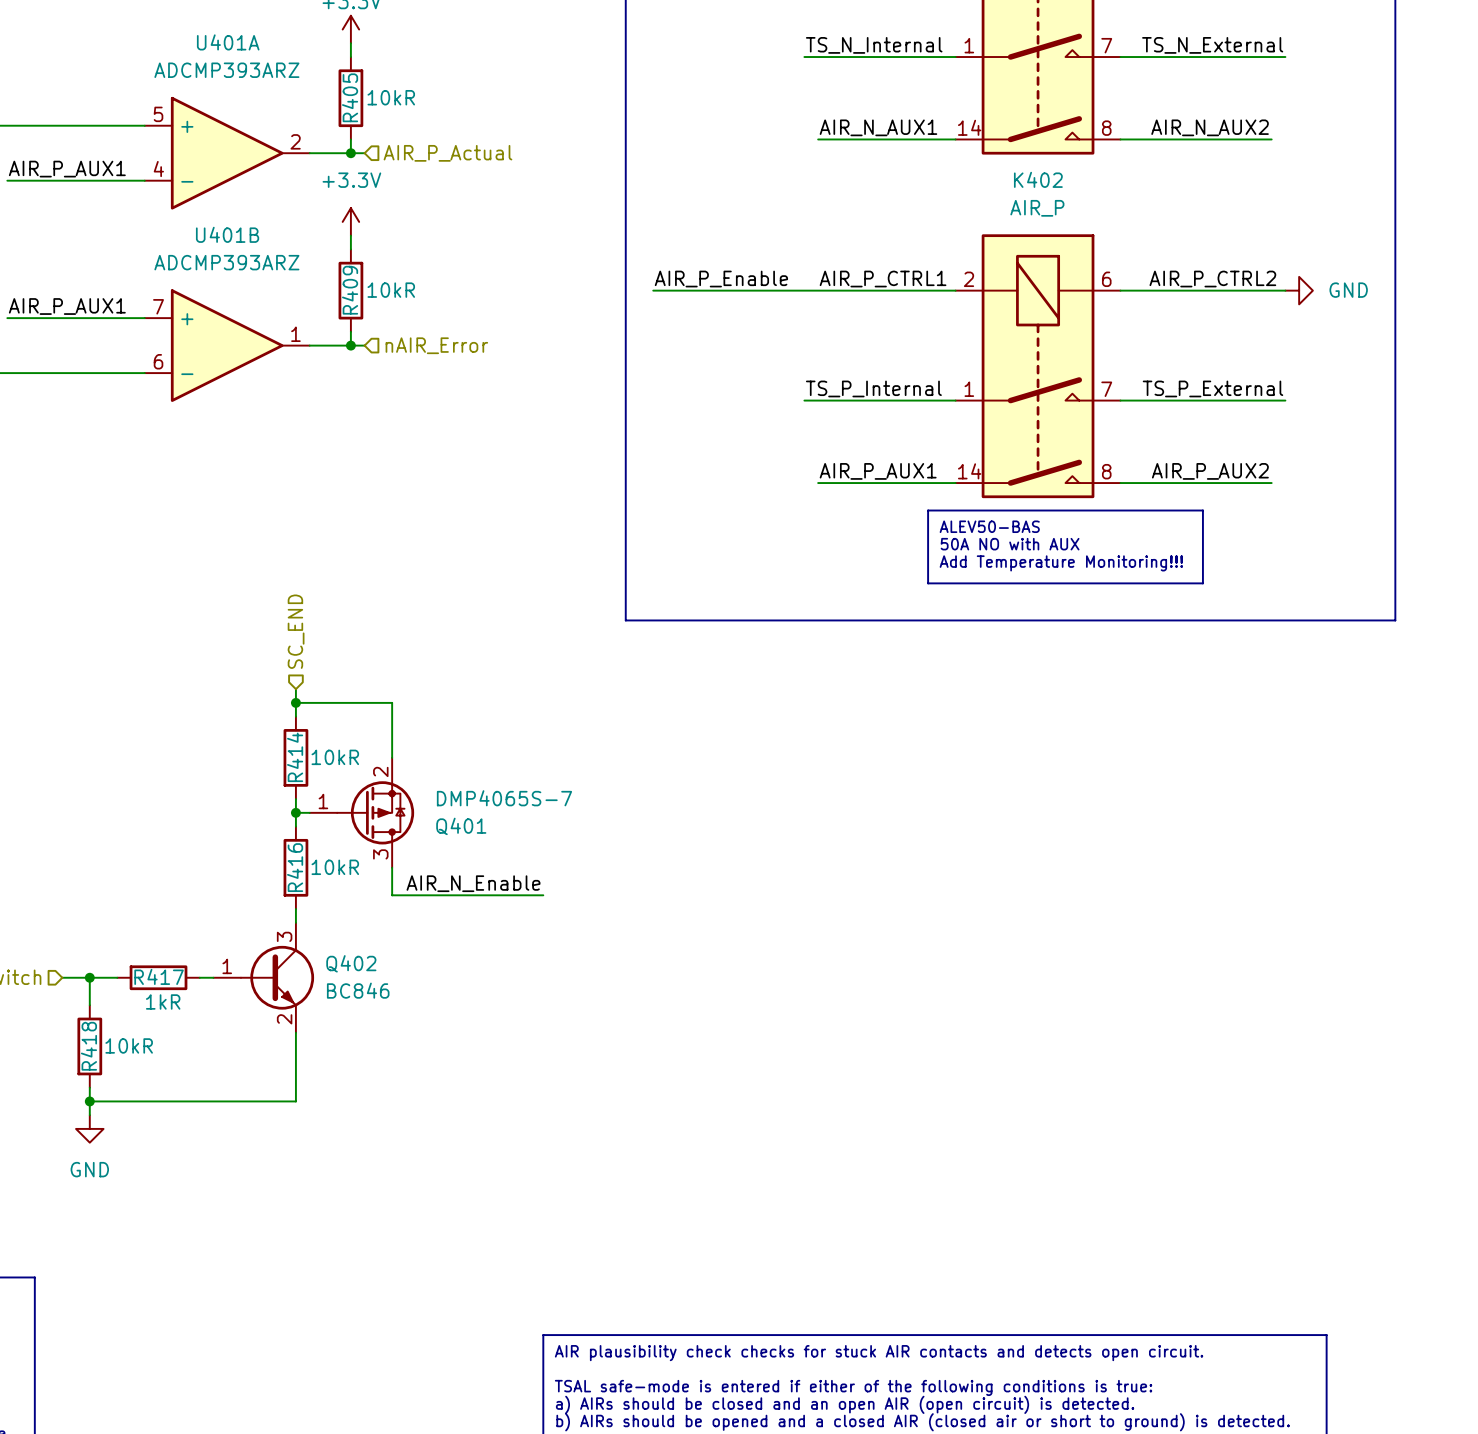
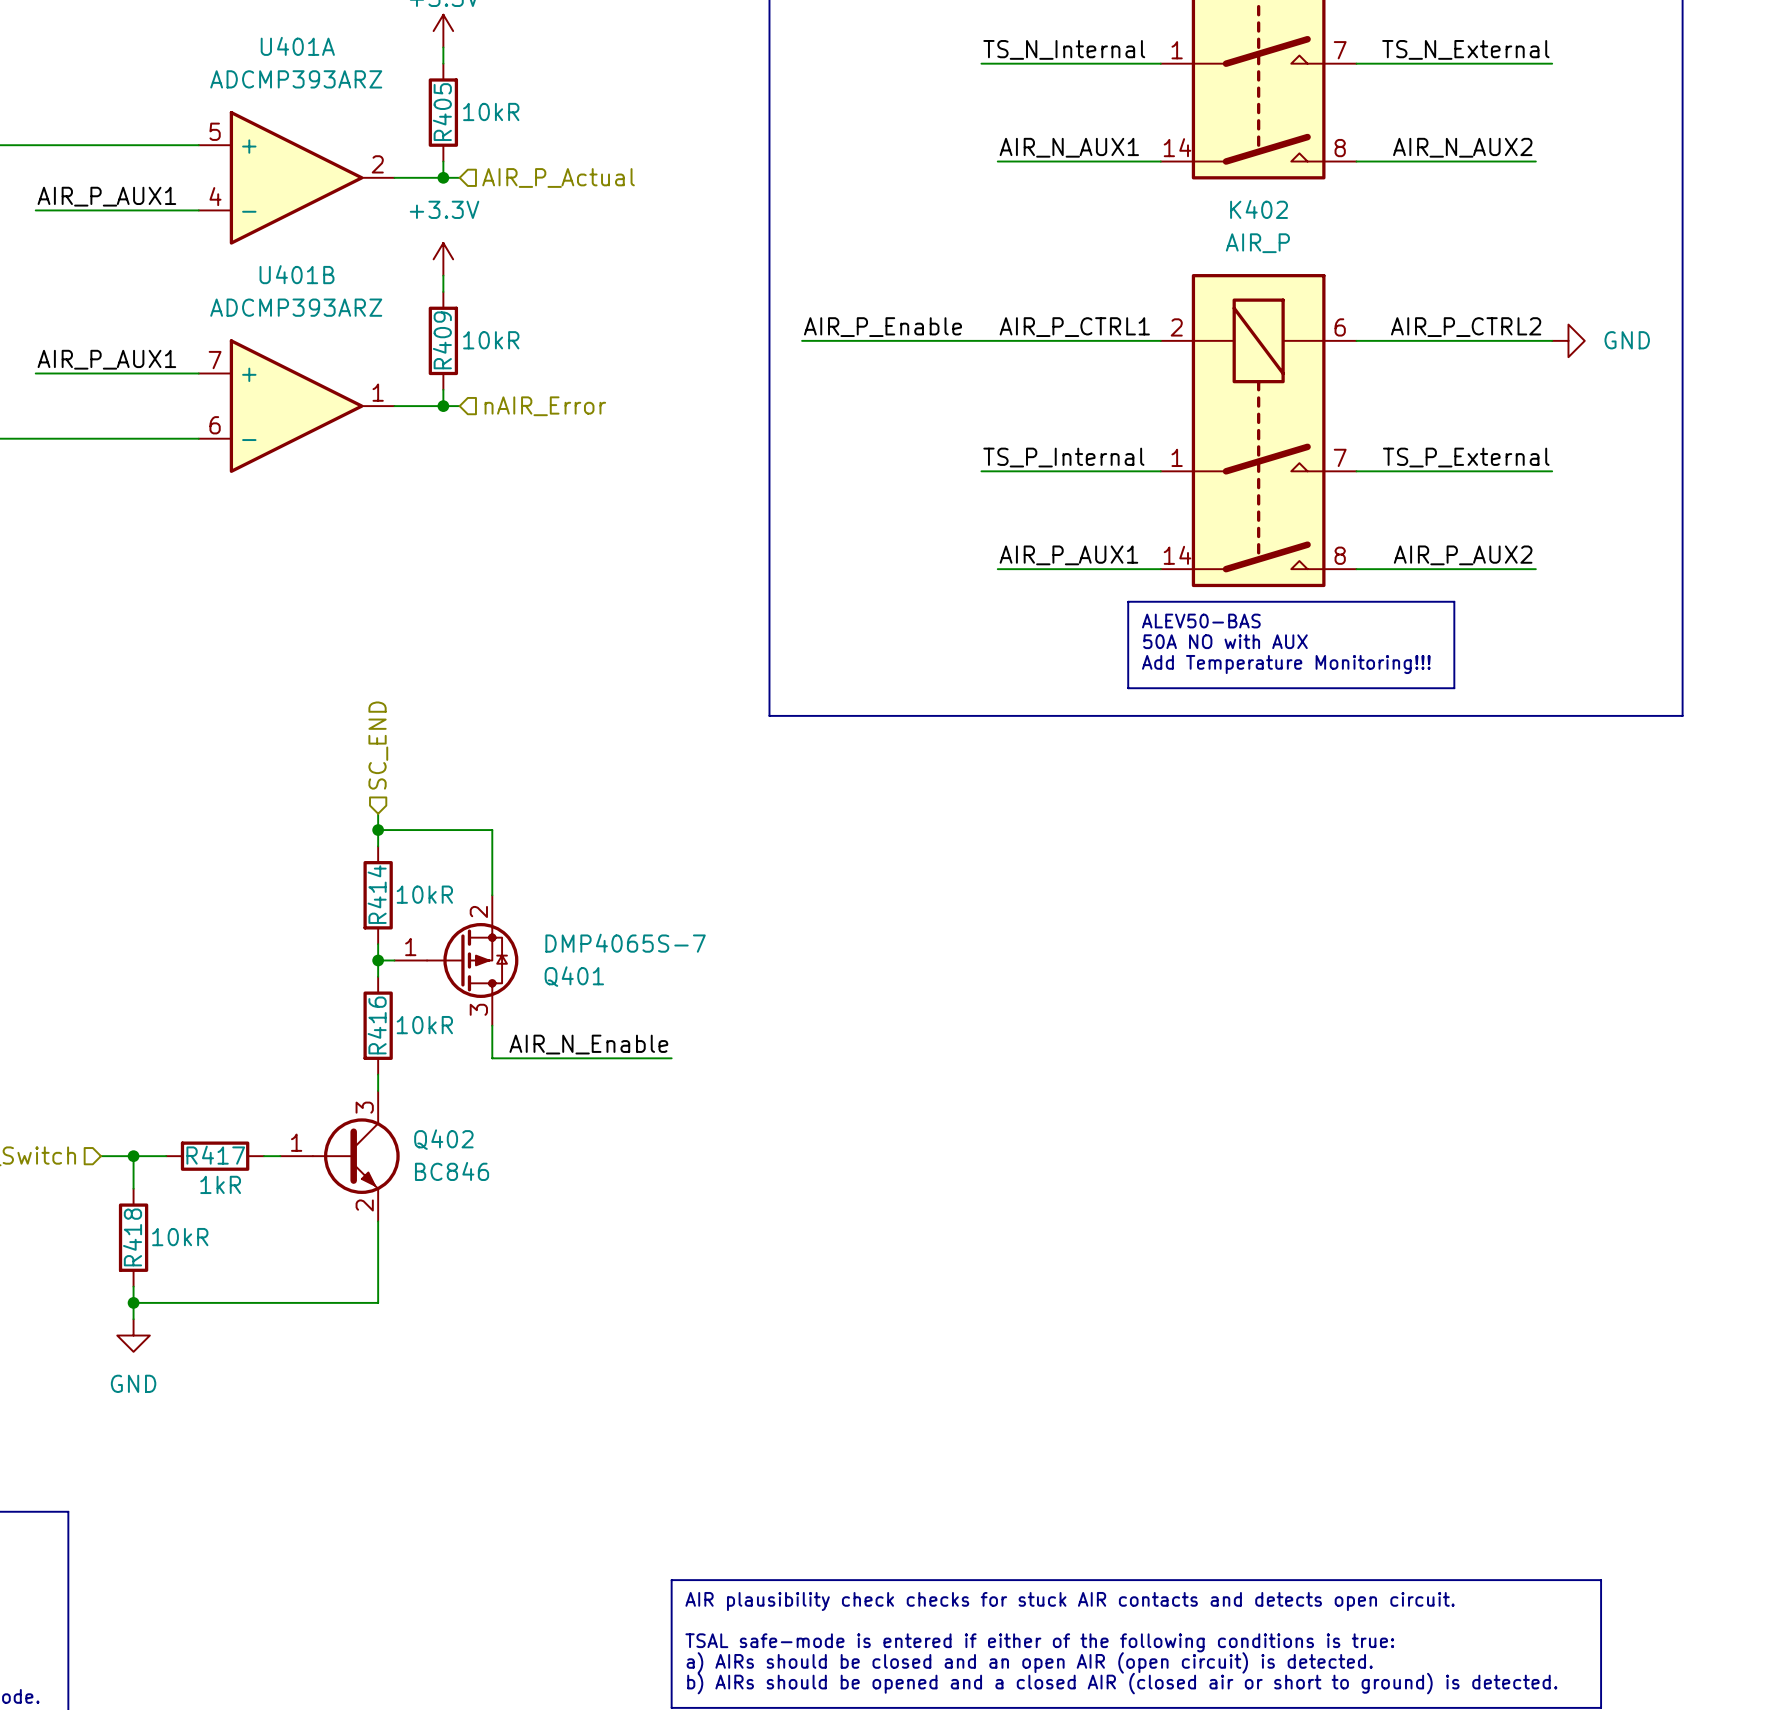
line: (625, 606) (625, 620) (1395, 620) (1395, 606) -> (769, 715) (1682, 715)

